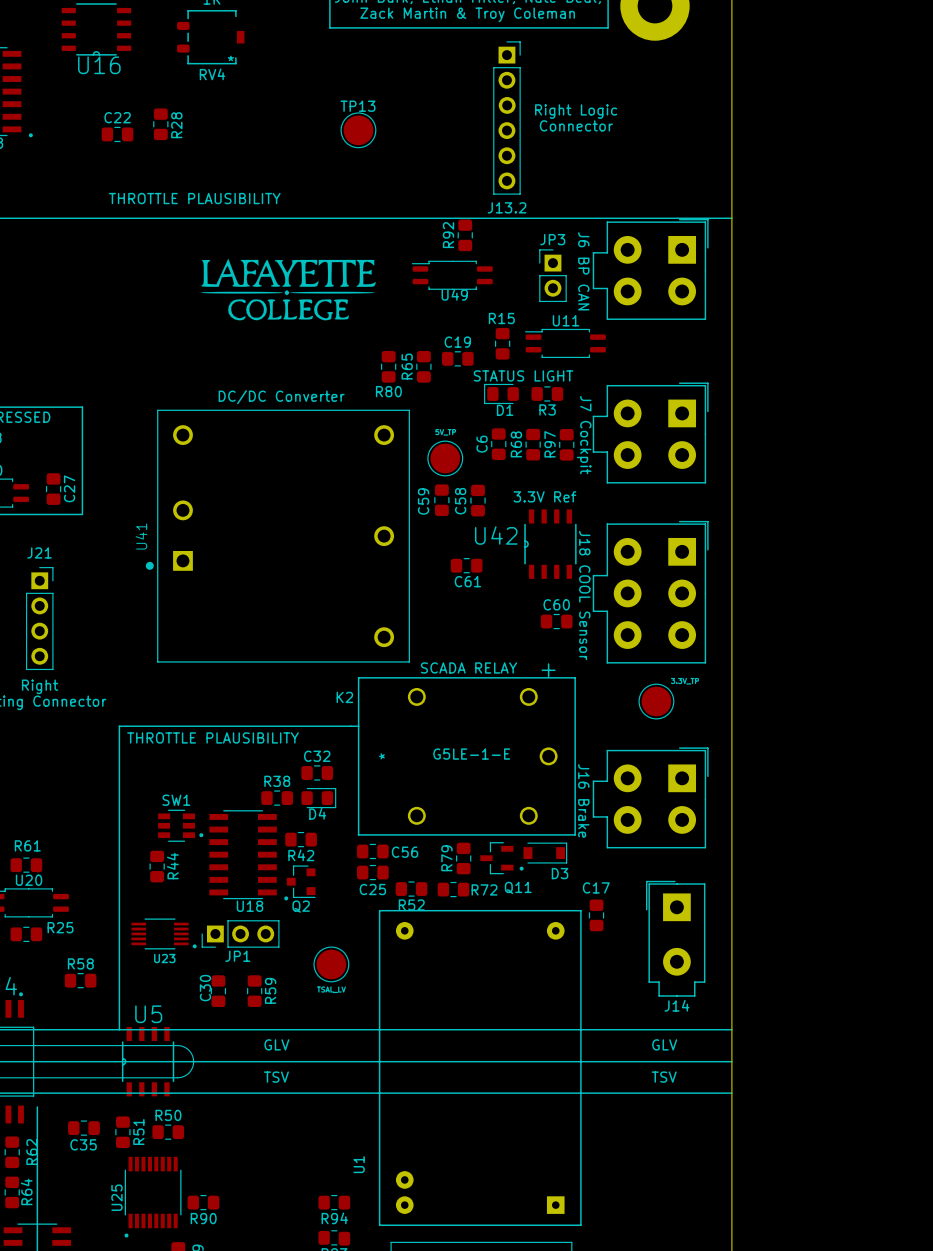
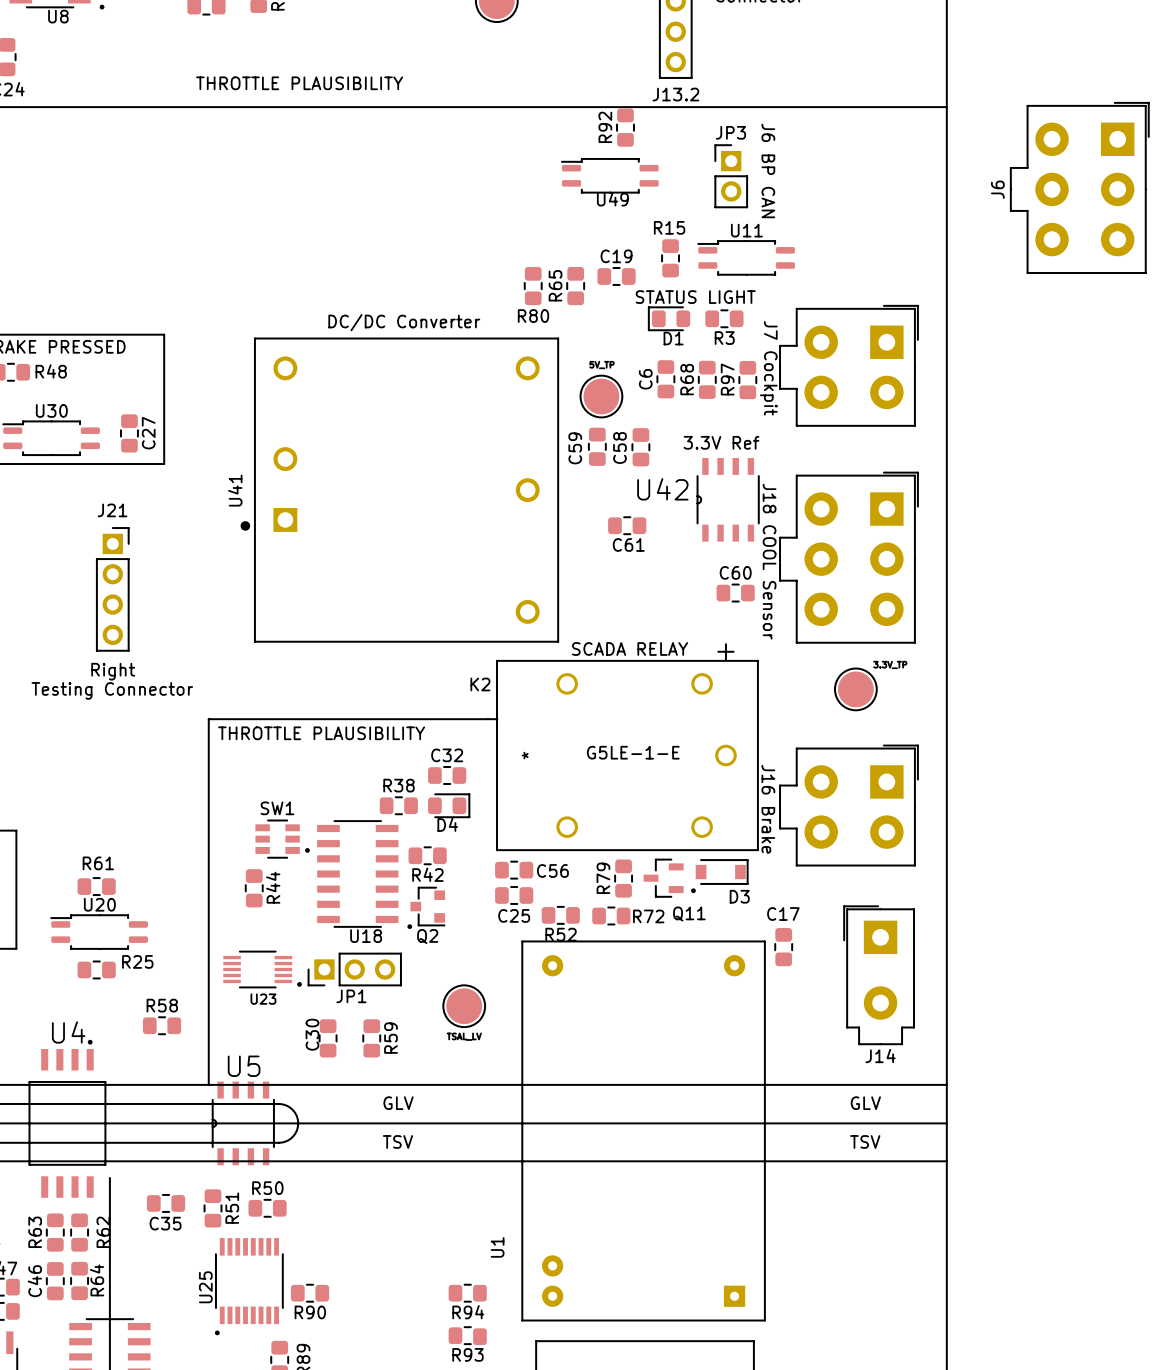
drawing: [200, 258, 376, 321] -> none
part: (650, 269) -> none
J6: none -> (1079, 187)

